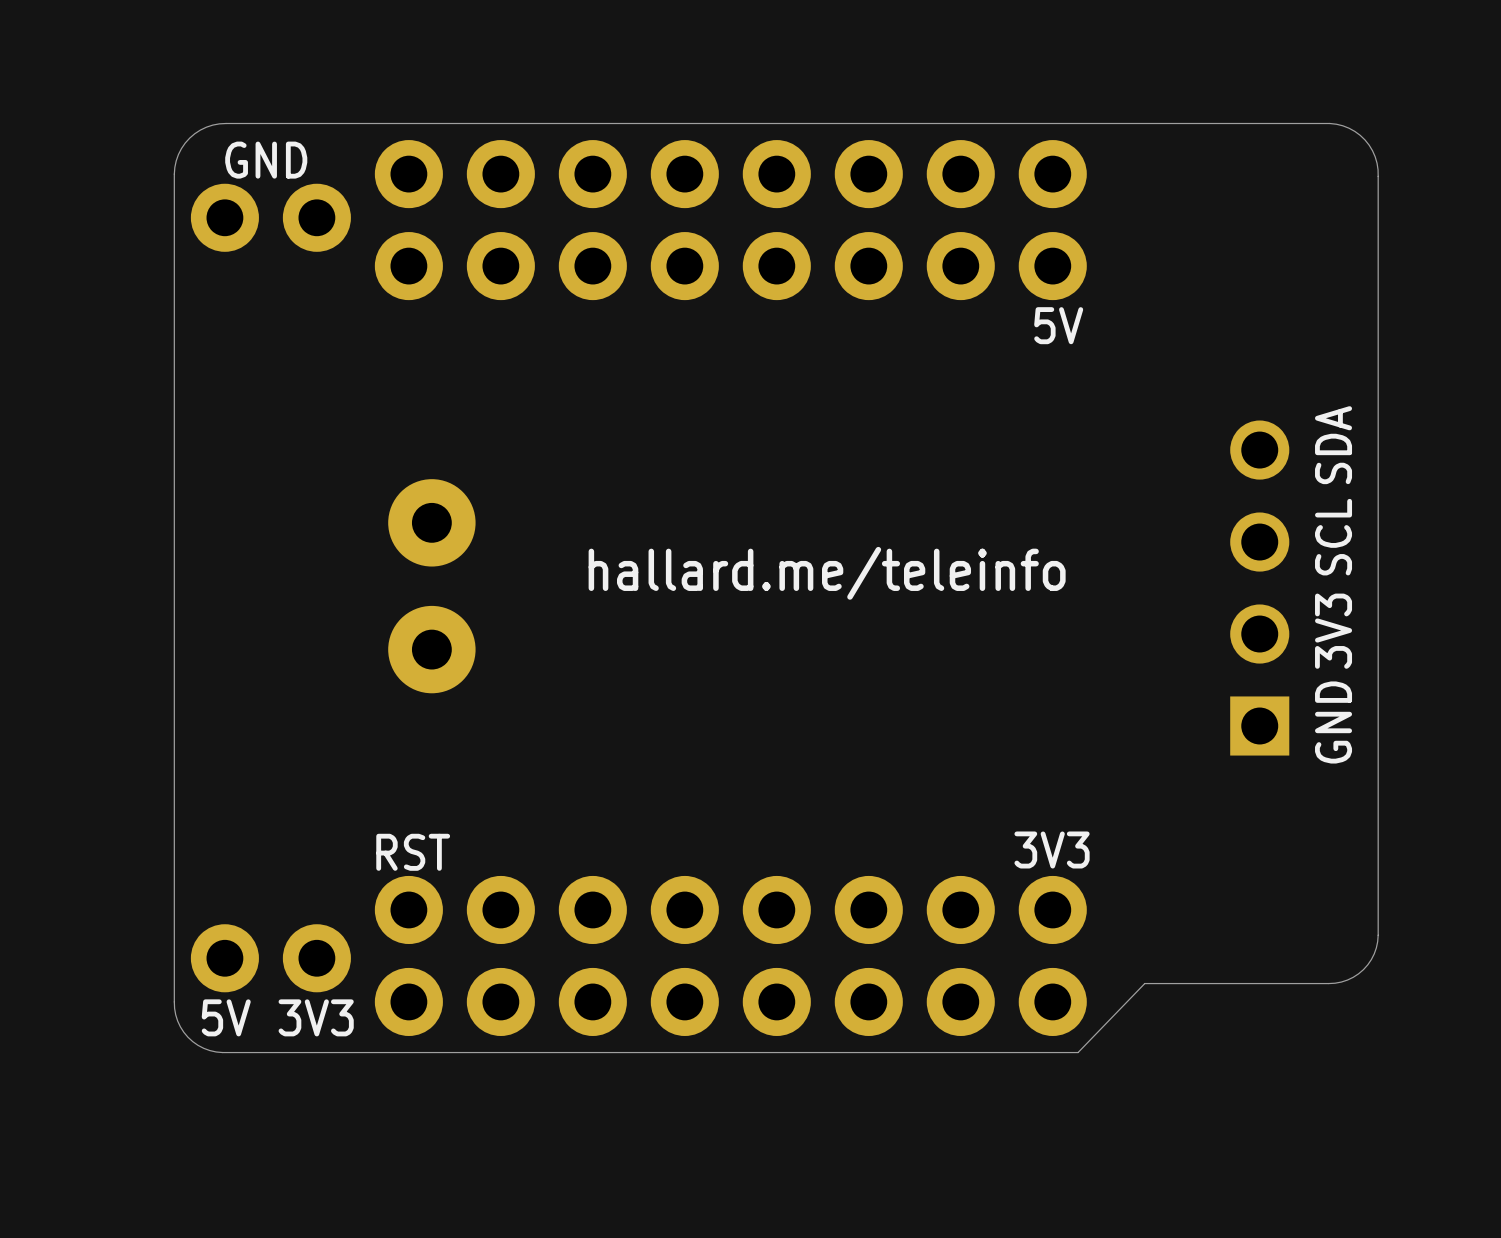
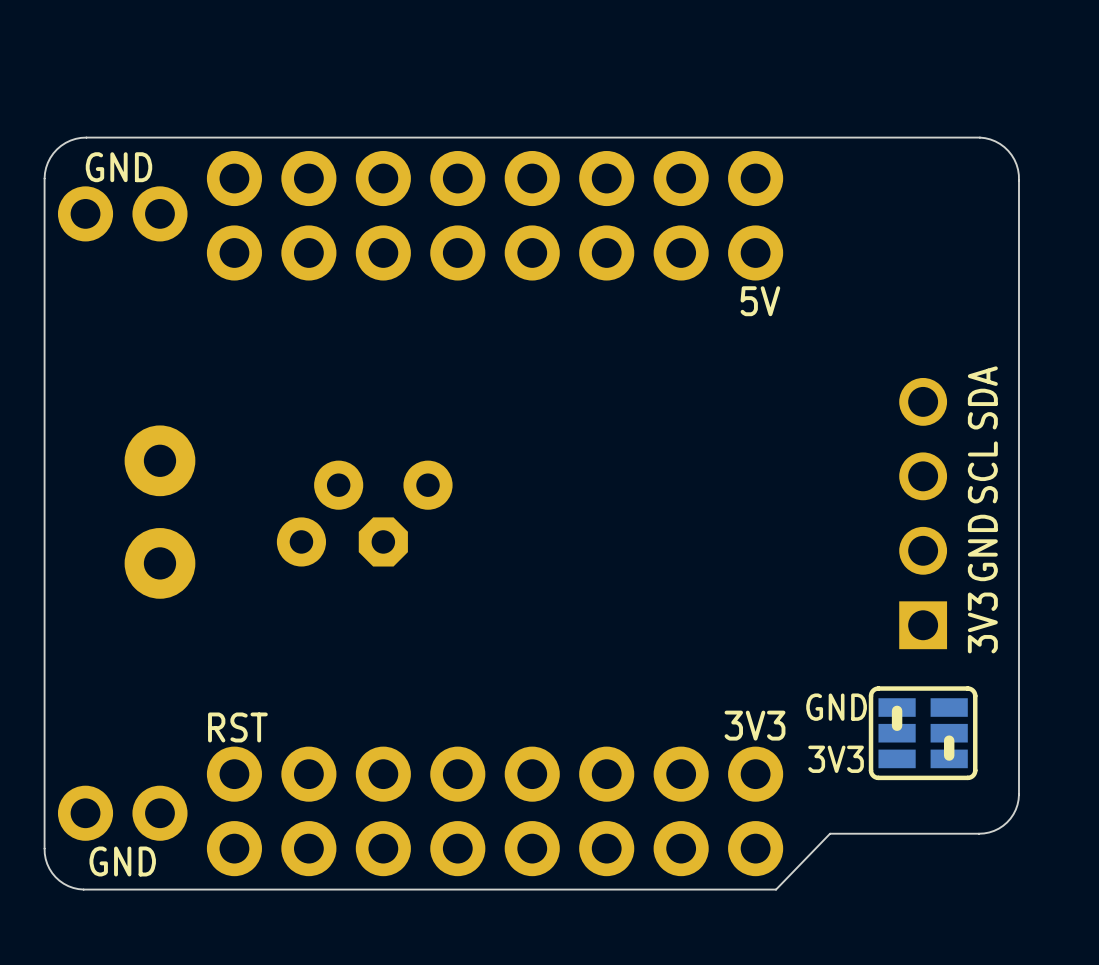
text: hallard.me/teleinfo (827, 573) -> none
part position: (431, 586) -> (159, 512)
part: none -> (364, 513)
text: 3V3 (1333, 631) -> GND (982, 547)
text: GND (1333, 722) -> 3V3 (982, 622)
text: none -> GND (836, 707)
part: none -> (923, 733)
text: 5V (226, 1017) -> none
text: none -> GND (122, 861)
text position: 3V3 (316, 1017) -> 3V3 (836, 759)

